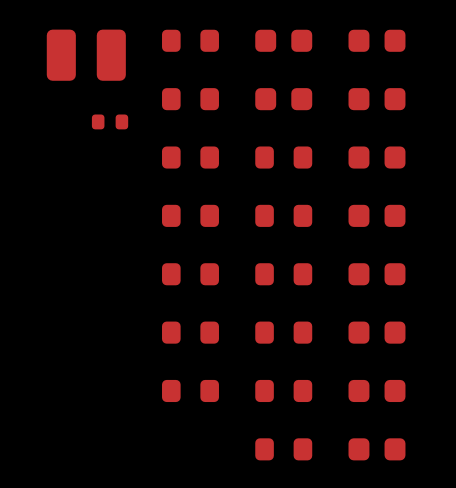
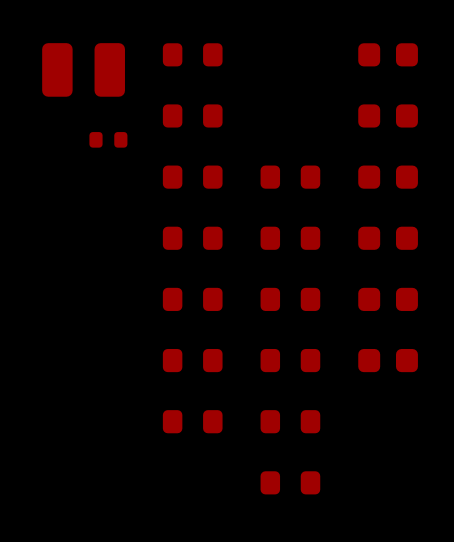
part: (283, 40) -> none
part: (283, 99) -> none
part: (376, 390) -> none
part: (376, 449) -> none

